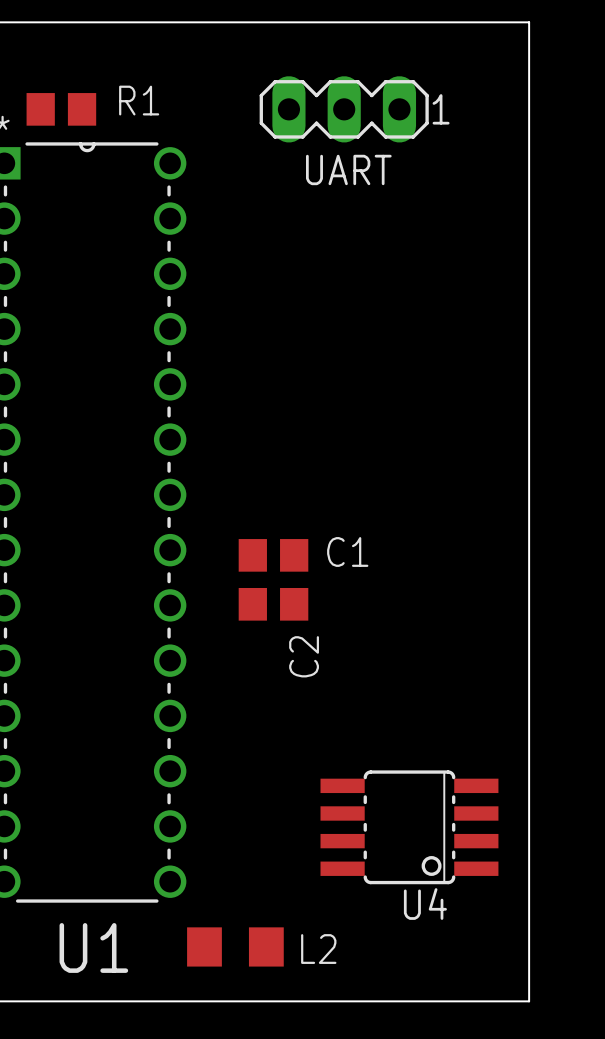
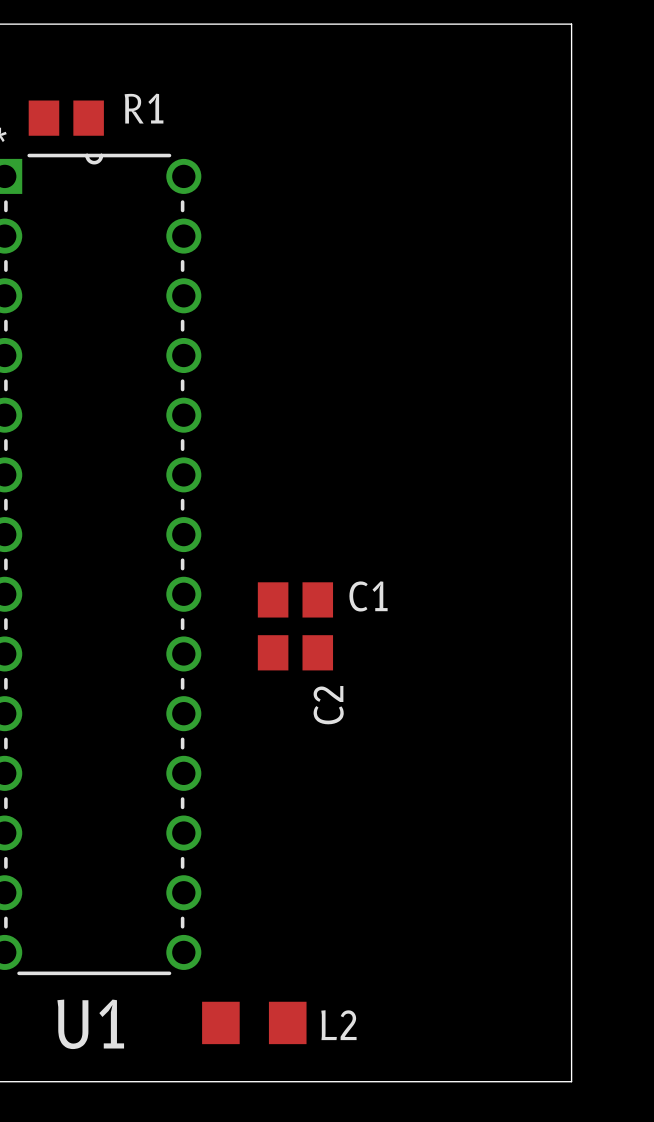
UART: (344, 109) -> none
U4: (409, 827) -> none

